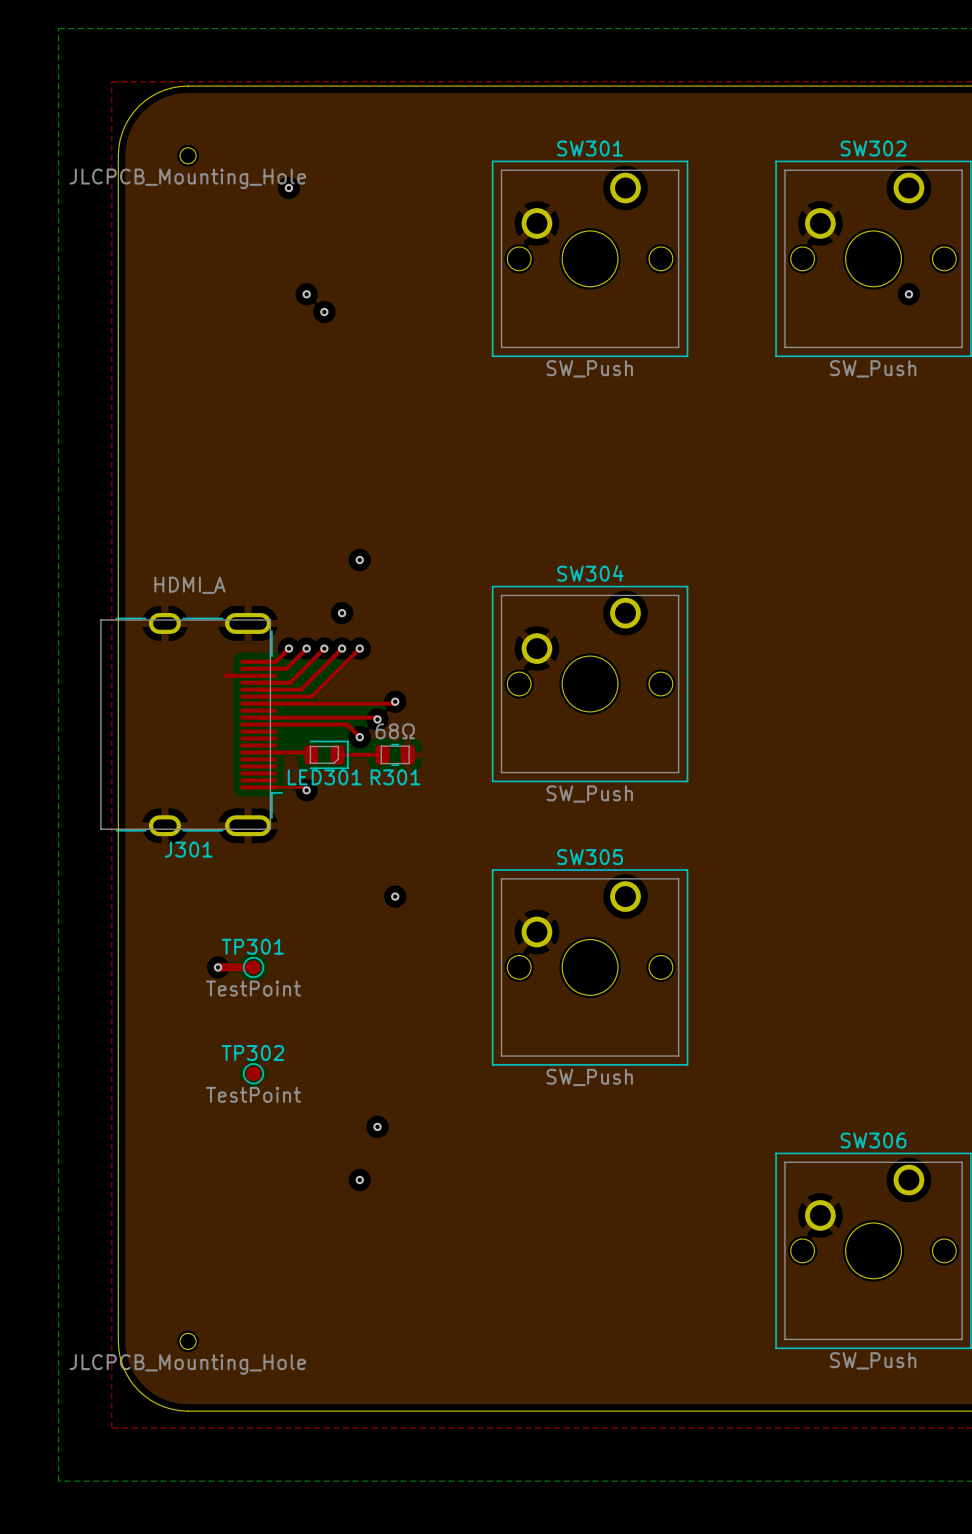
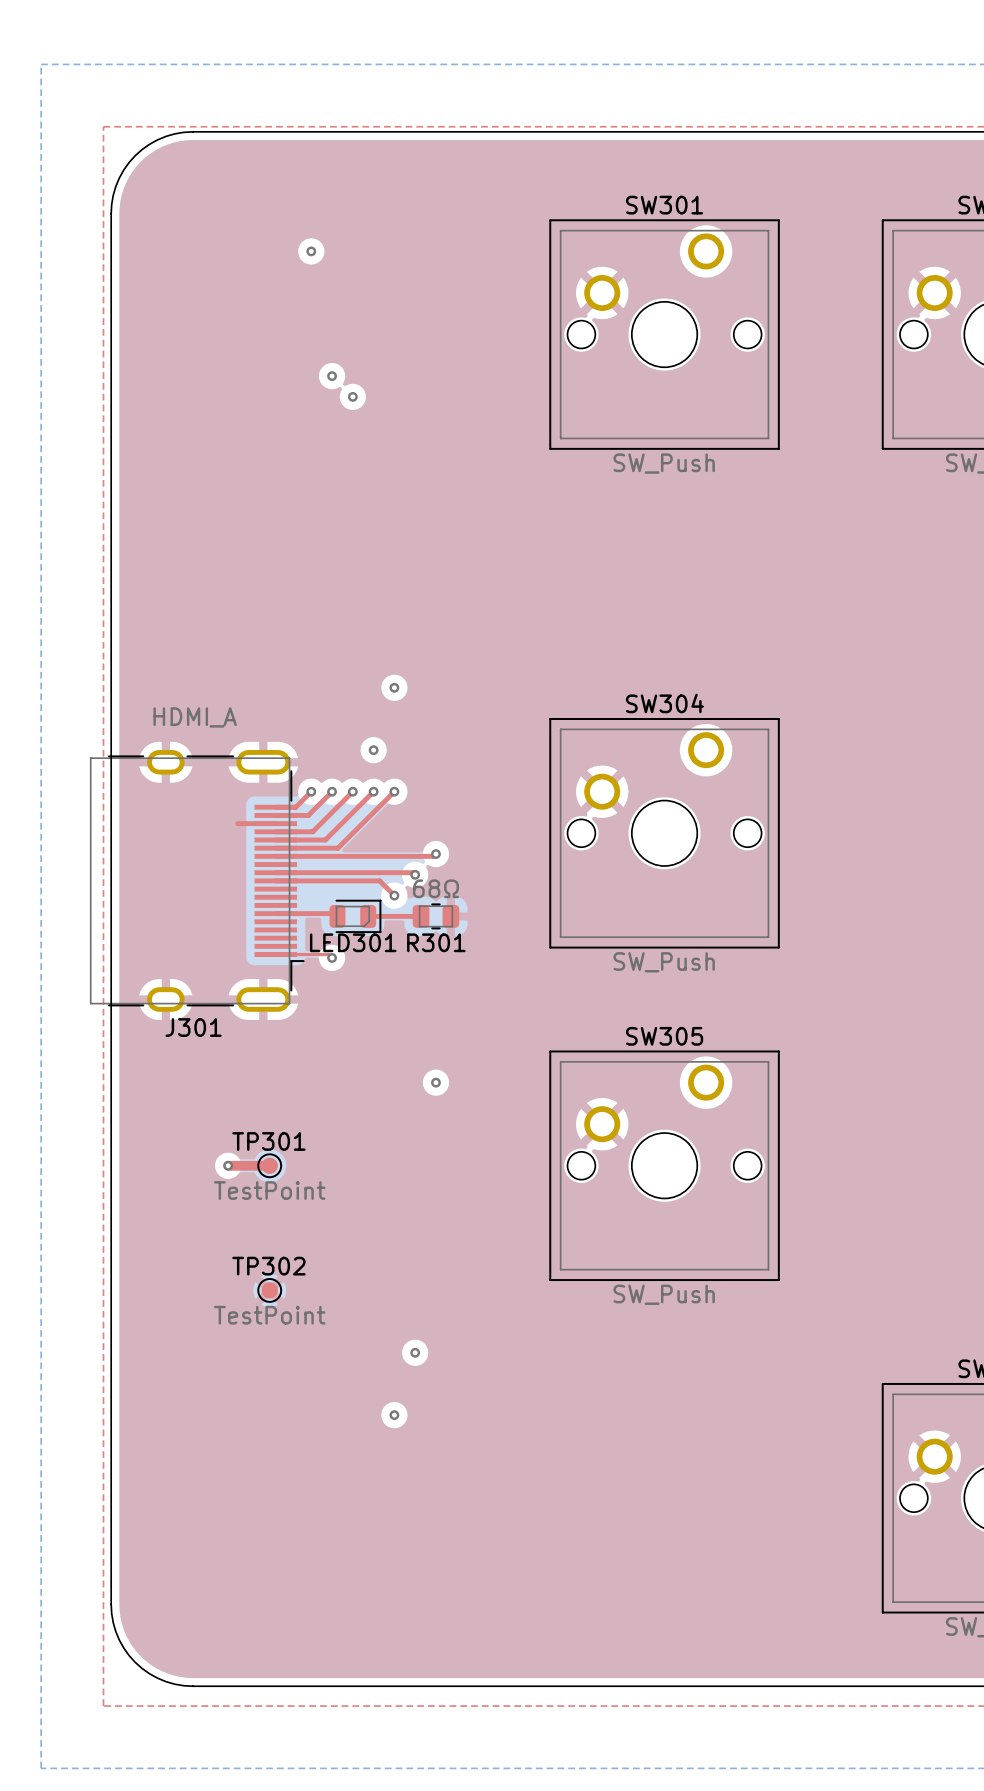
part: JLCPCB_Mounting_Hole (188, 155) -> none
part: JLCPCB_Mounting_Hole (188, 1341) -> none

